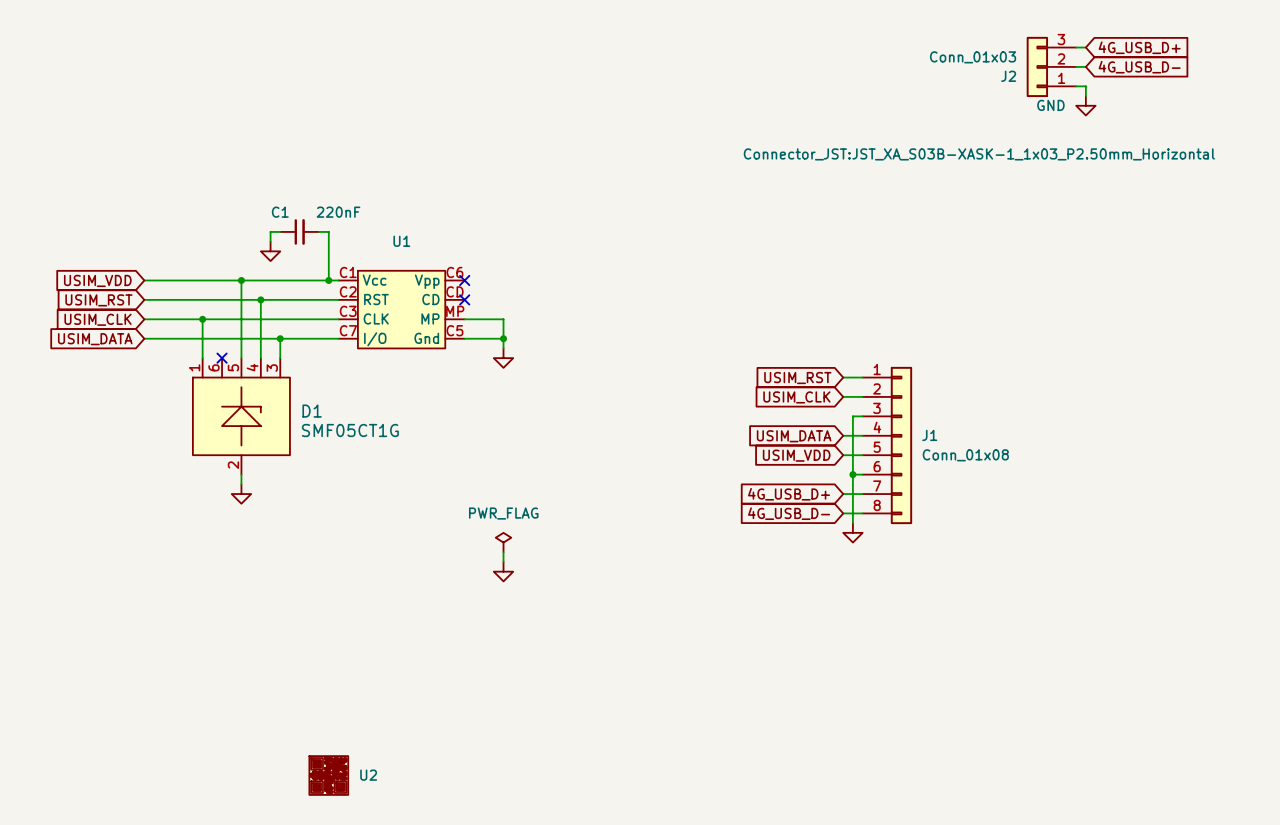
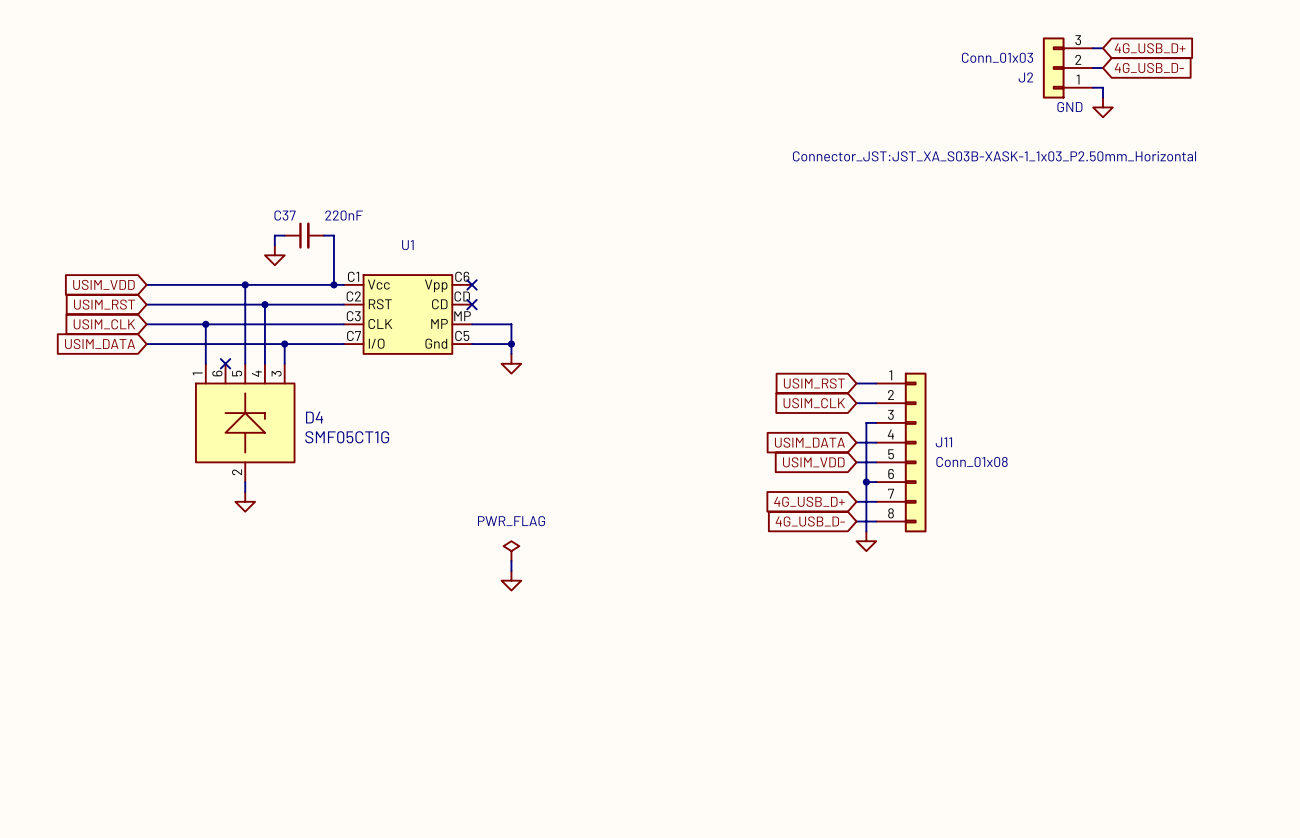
C1 name: C1 (280, 212) -> C37 (285, 215)
D1 name: D1 (312, 411) -> D4 (314, 417)
J1 name: J1 (929, 435) -> J11 (943, 442)
U2: (328, 775) -> none

